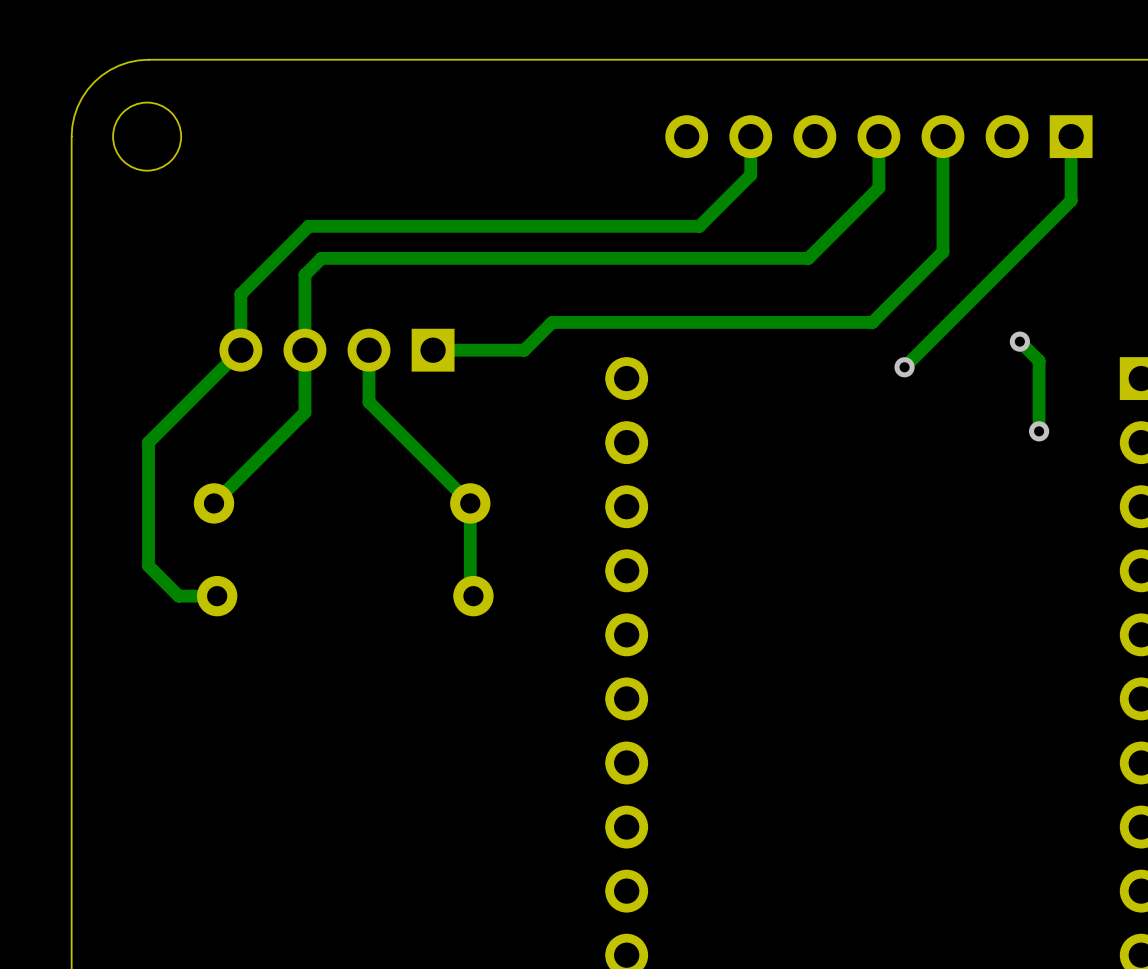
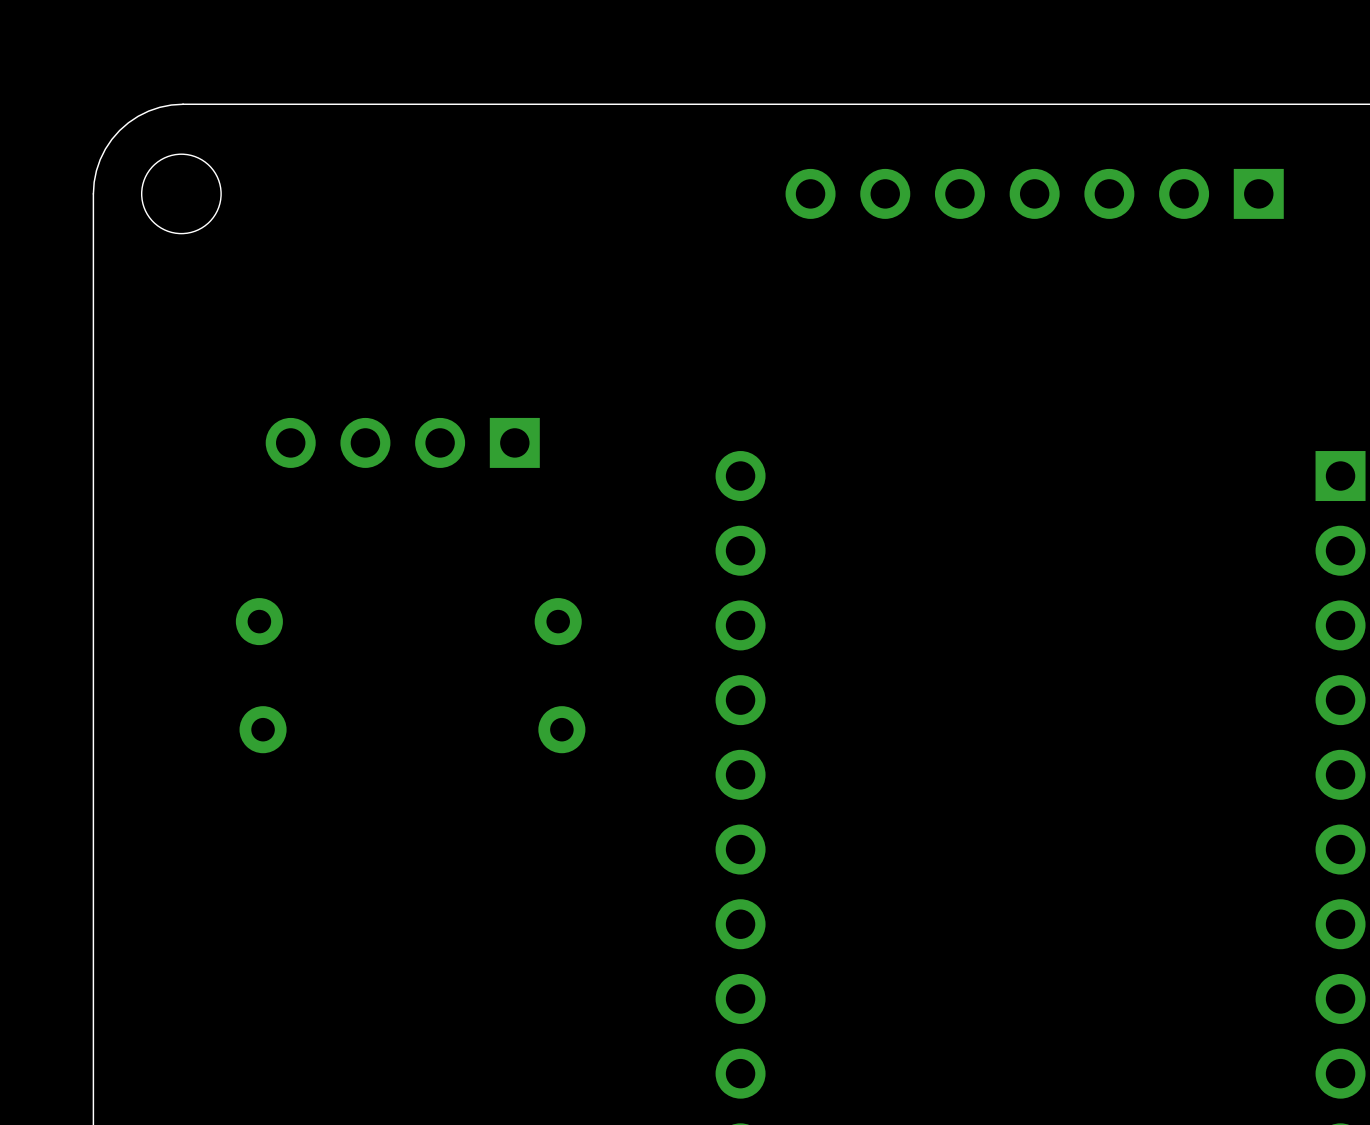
track: (750, 136) (750, 175) (699, 226) (308, 226) (240, 294) (240, 350) (148, 442) (148, 565) (178, 596) (217, 596) -> none
track: (878, 136) (878, 187) (808, 258) (321, 258) (304, 274) (304, 412) (214, 503) -> none
track: (942, 136) (942, 251) (872, 322) (552, 322) (524, 350) (433, 350) -> none
track: (1071, 136) (1071, 200) (904, 367) -> none
track: (1019, 341) (1039, 360) (1039, 431) -> none
via: (1019, 341) -> none
track: (369, 350) (369, 402) (470, 503) (470, 592) (473, 596) -> none
via: (904, 367) -> none
via: (1039, 431) -> none

